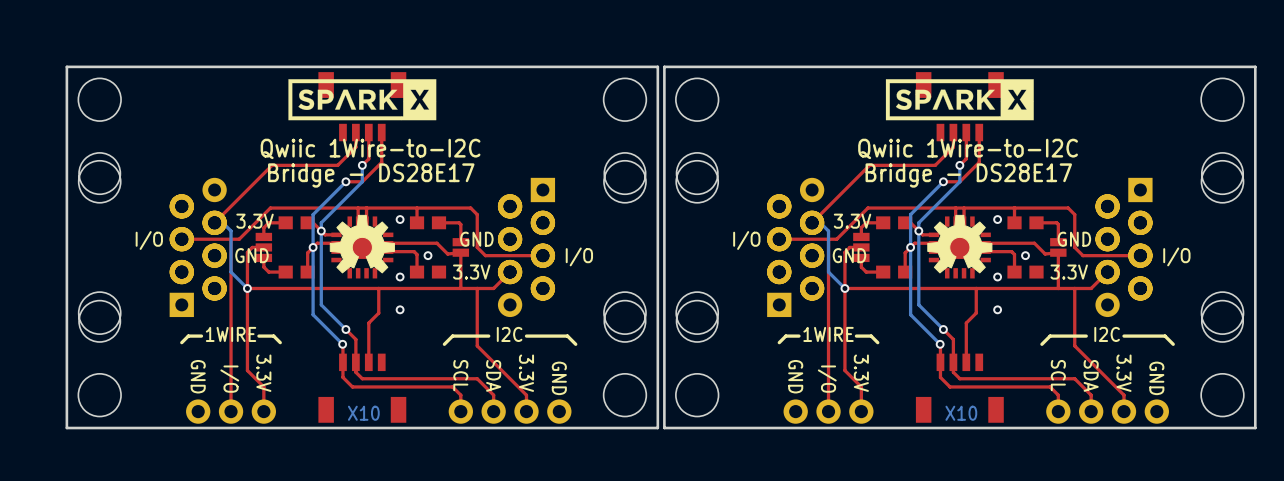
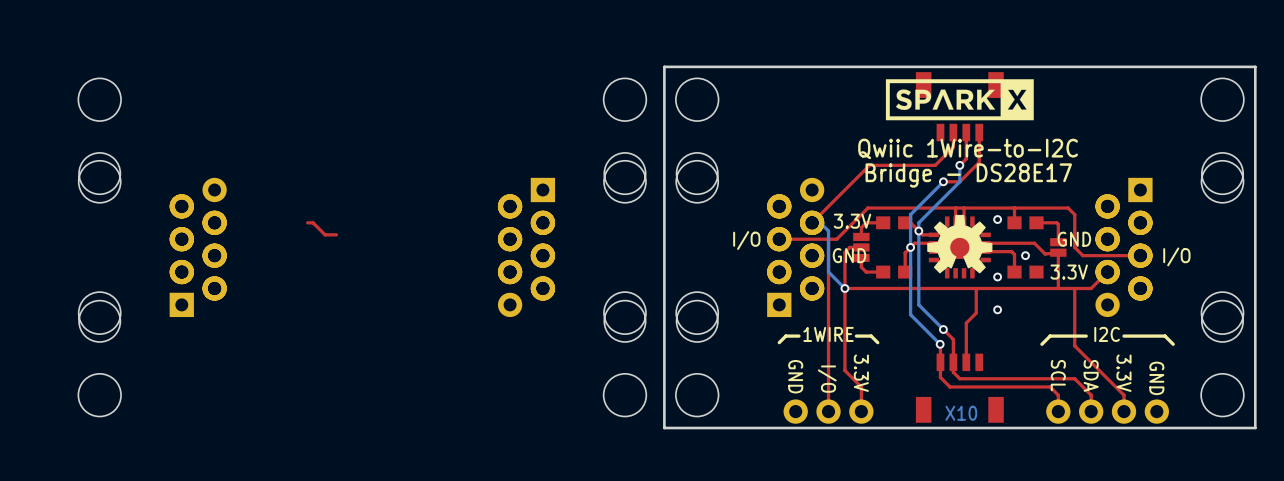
board edge: (657, 66) (657, 428) (66, 428) (66, 66) (657, 66) -> none
drawing: [288, 79, 437, 121] -> none
part: (362, 106) -> none
top track: (355, 132) (355, 147) (337, 165) (272, 165) (214, 222) -> none
top track: (368, 132) (368, 158) (362, 165) -> none
top track: (381, 132) (381, 162) (362, 181) (345, 181) -> none
text: Qwiic 1Wire-to-I2C (370, 148) -> none
bottom track: (362, 165) (362, 181) (321, 222) (321, 304) (345, 329) -> none
via: (362, 165) -> none
text: Bridge - DS28E17 (371, 175) -> none
bottom track: (345, 181) (313, 214) (313, 314) (342, 344) -> none
via: (345, 181) -> none
top track: (358, 208) (358, 221) -> none
top track: (366, 208) (366, 221) -> none
top track: (417, 208) (417, 222) -> none
drawing: [329, 214, 395, 274] -> none
via: (400, 219) -> none
text: 3.3V (255, 221) -> none
bottom track: (214, 222) (222, 222) (231, 231) (231, 272) (247, 288) -> none
top track: (285, 222) (268, 222) (263, 227) (263, 236) -> none
part: (296, 222) -> none
part: (428, 222) -> none
top track: (438, 222) (459, 222) (460, 242) -> none
via: (321, 231) -> none
top track: (181, 239) (239, 239) (270, 208) (470, 208) (477, 214) (477, 247) (485, 255) (542, 255) -> none
top track: (231, 239) (231, 411) -> none
text: GND (476, 239) -> none
text: I/O (149, 240) -> none
top track: (336, 243) (317, 243) (307, 252) (307, 272) -> none
top track: (388, 243) (436, 243) (447, 254) (460, 252) (460, 288) -> none
top track: (263, 247) (252, 247) (247, 252) (247, 370) (263, 386) (263, 411) -> none
part: (263, 247) -> none
via: (313, 247) -> none
part: (362, 247) -> none
part: (460, 247) -> none
top track: (388, 251) (414, 251) (417, 254) (417, 272) -> none
text: GND (251, 255) -> none
via: (428, 255) -> none
text: I/O (579, 256) -> none
top track: (263, 257) (263, 267) (268, 272) (285, 272) -> none
part: (296, 272) -> none
part: (428, 272) -> none
text: 3.3V (471, 272) -> none
top track: (510, 272) (493, 288) (247, 288) -> none
via: (400, 276) -> none
via: (247, 288) -> none
top track: (378, 288) (378, 313) (368, 323) (368, 362) -> none
top track: (477, 288) (477, 345) (526, 395) (526, 411) -> none
via: (400, 309) -> none
top track: (345, 329) (355, 339) (355, 372) (362, 378) (477, 378) (493, 395) (493, 411) -> none
via: (345, 329) -> none
text: 1WIRE (231, 334) -> none
text: I2C (509, 334) -> none
line: (201, 336) (188, 336) (181, 342) -> none
line: (258, 336) (273, 336) (280, 342) -> none
line: (488, 336) (452, 336) (444, 344) -> none
line: (526, 336) (567, 336) (575, 344) -> none
top track: (342, 344) (342, 377) (352, 386) (452, 386) (460, 395) (460, 411) -> none
via: (342, 344) -> none
text: 3.3V (263, 373) -> none
text: 3.3V (526, 373) -> none
text: SCL (460, 375) -> none
text: SDA (493, 375) -> none
text: GND (198, 376) -> none
text: GND (559, 378) -> none
text: I/O (229, 379) -> none
part: (362, 388) -> none
part: (231, 411) -> none
part: (510, 411) -> none
text: X10 (363, 413) -> none

